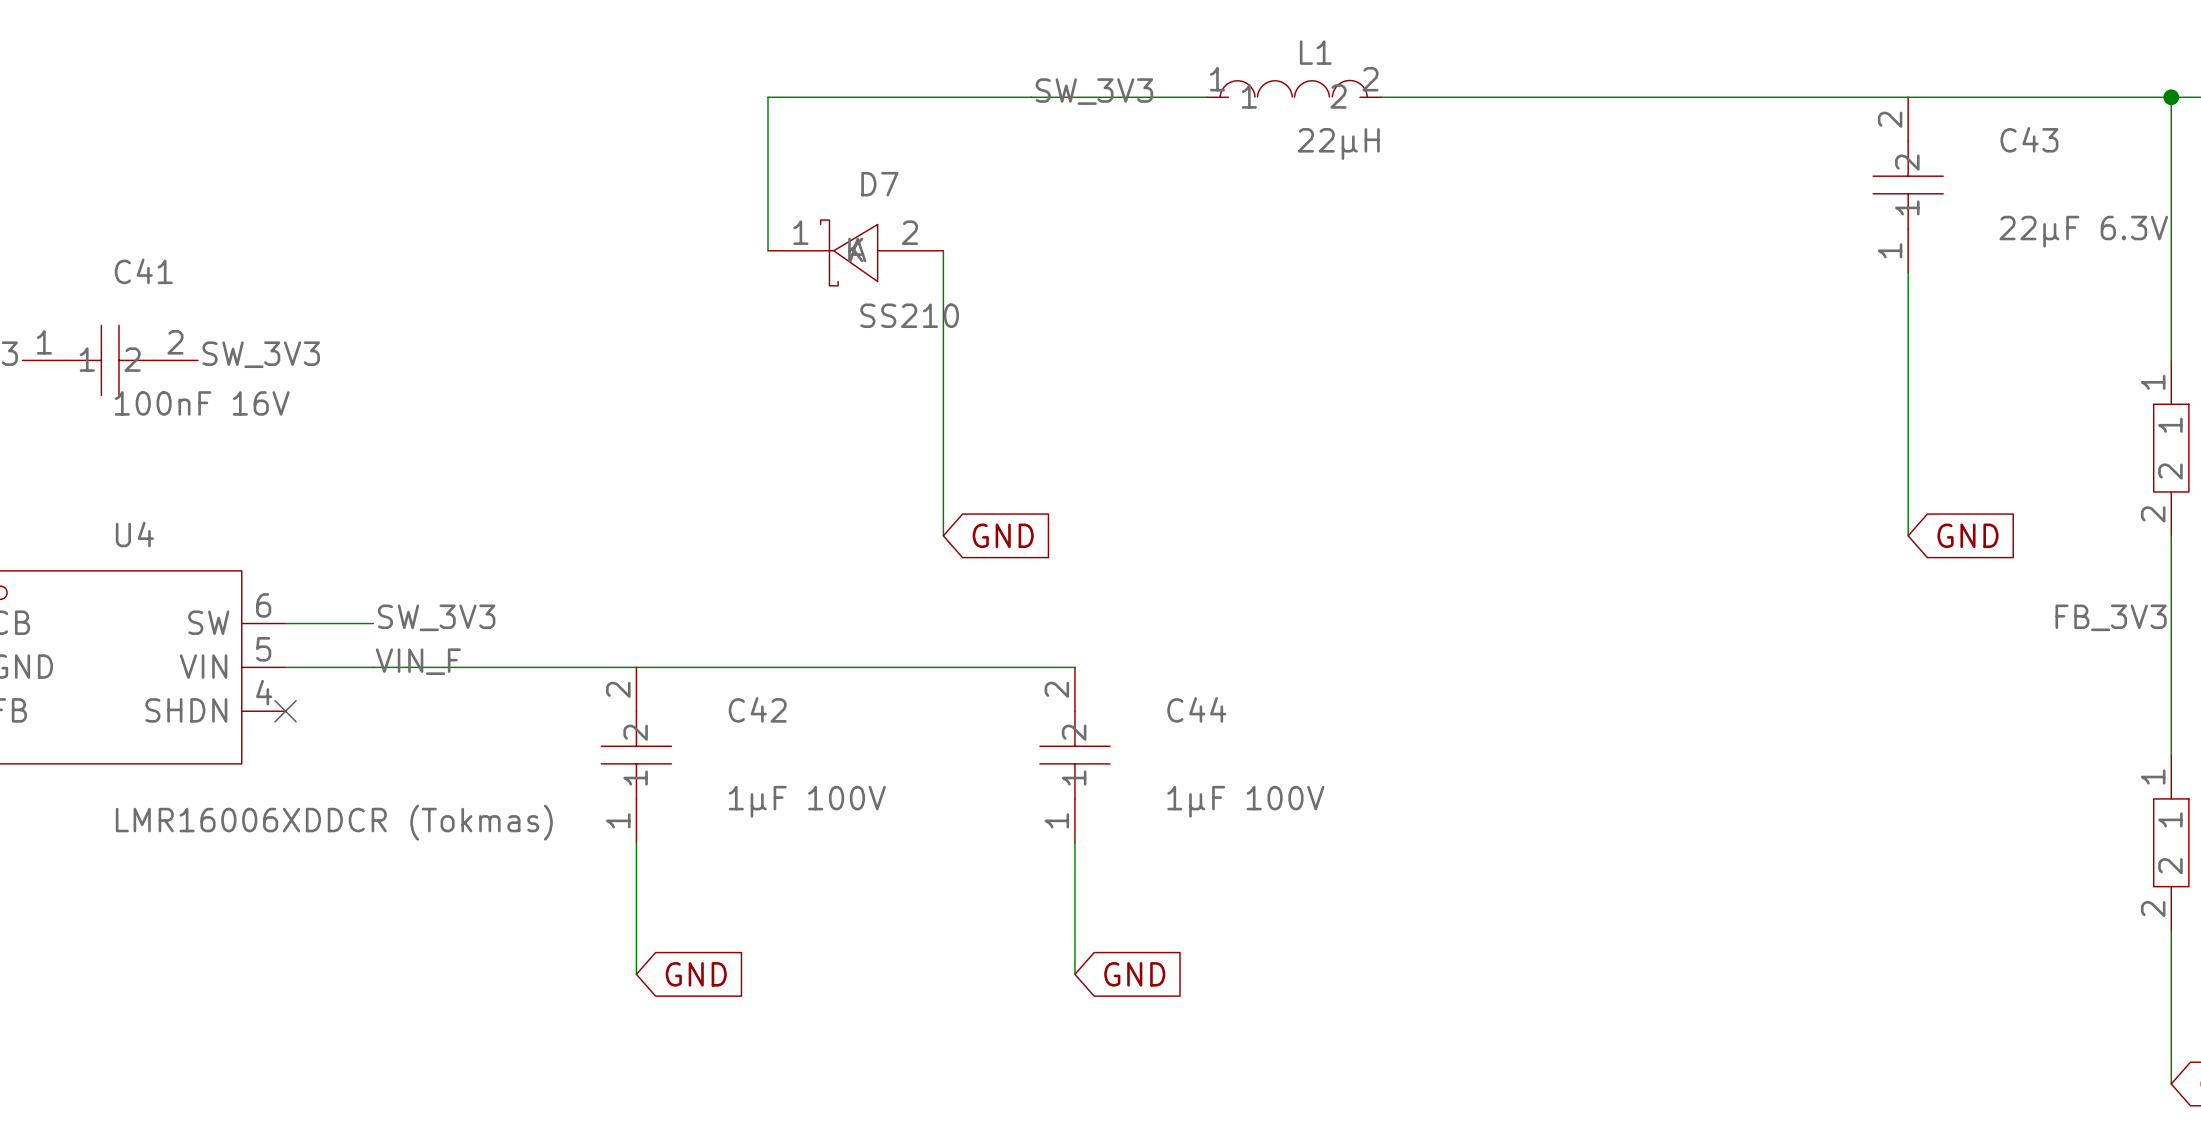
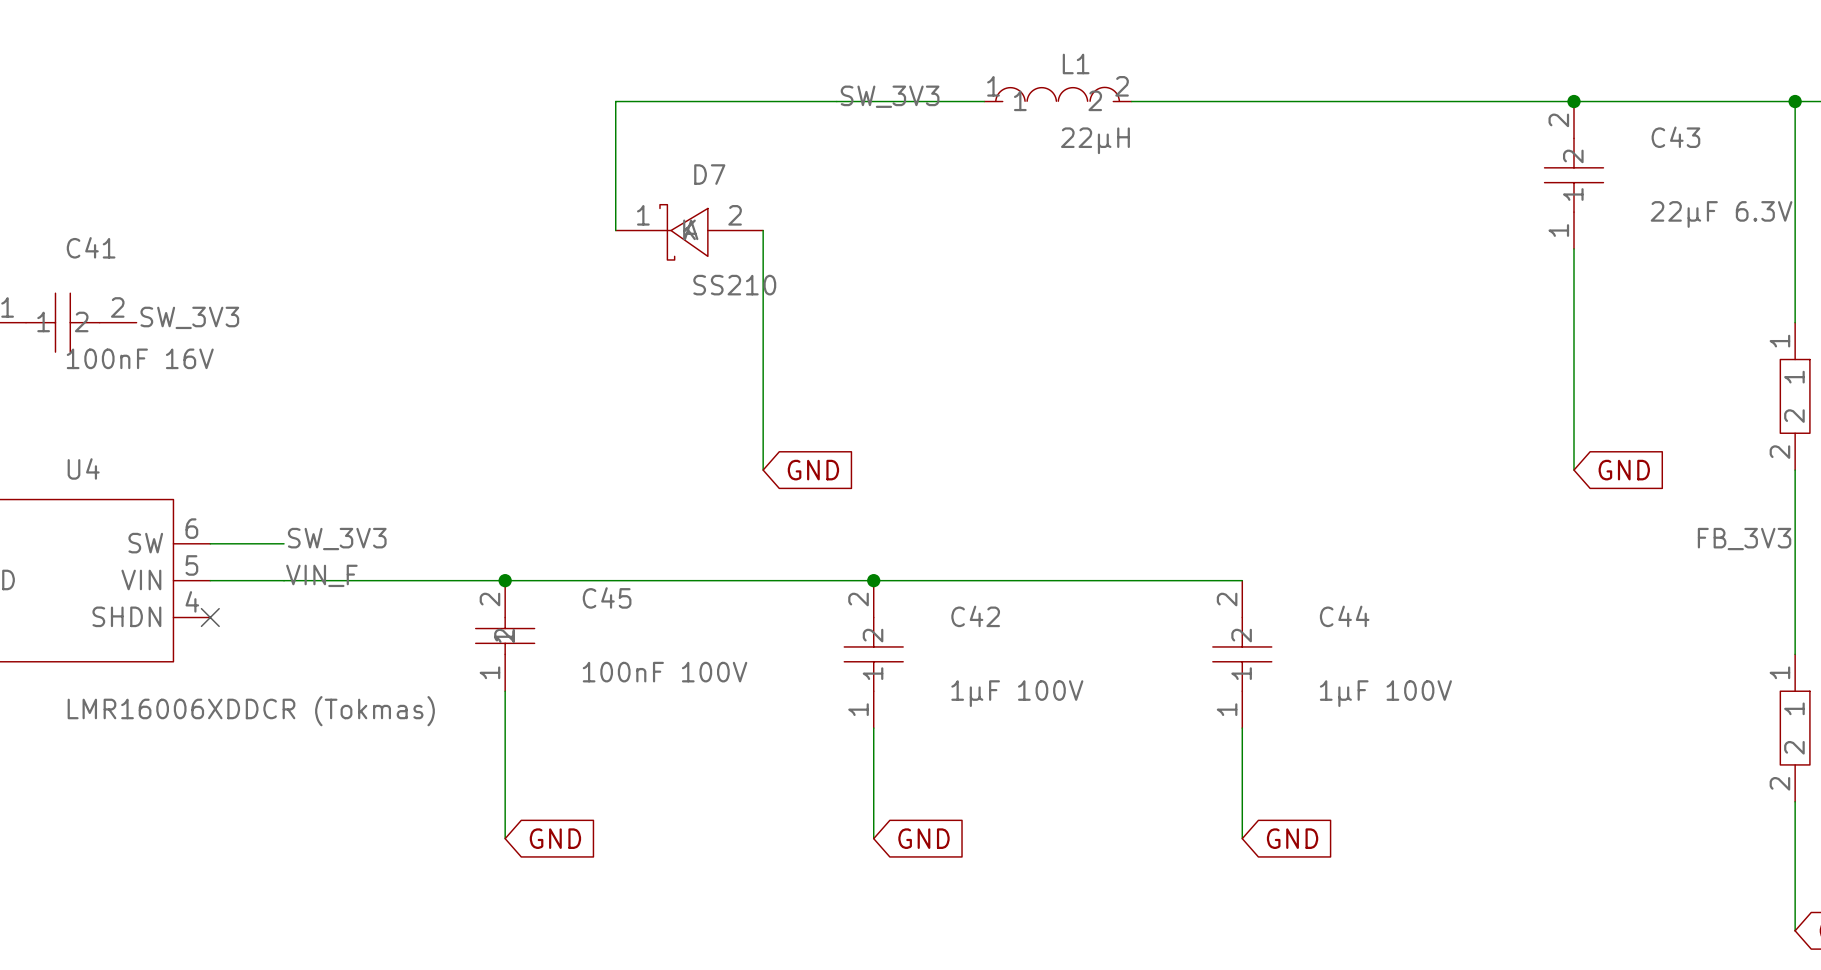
junction: none -> (1574, 101)
junction: none -> (505, 580)
wire: none -> (873, 580) (1242, 580)
junction: none -> (873, 580)
C44 name: C44 (1196, 709) -> C42 (975, 616)
C45: none -> 100nF 100V (505, 635)
C42: 1µF 100V (636, 755) -> none
C44: none -> 1µF 100V (1242, 654)
wire: none -> (1242, 728) (1242, 838)
global label: none -> GND (1292, 838)

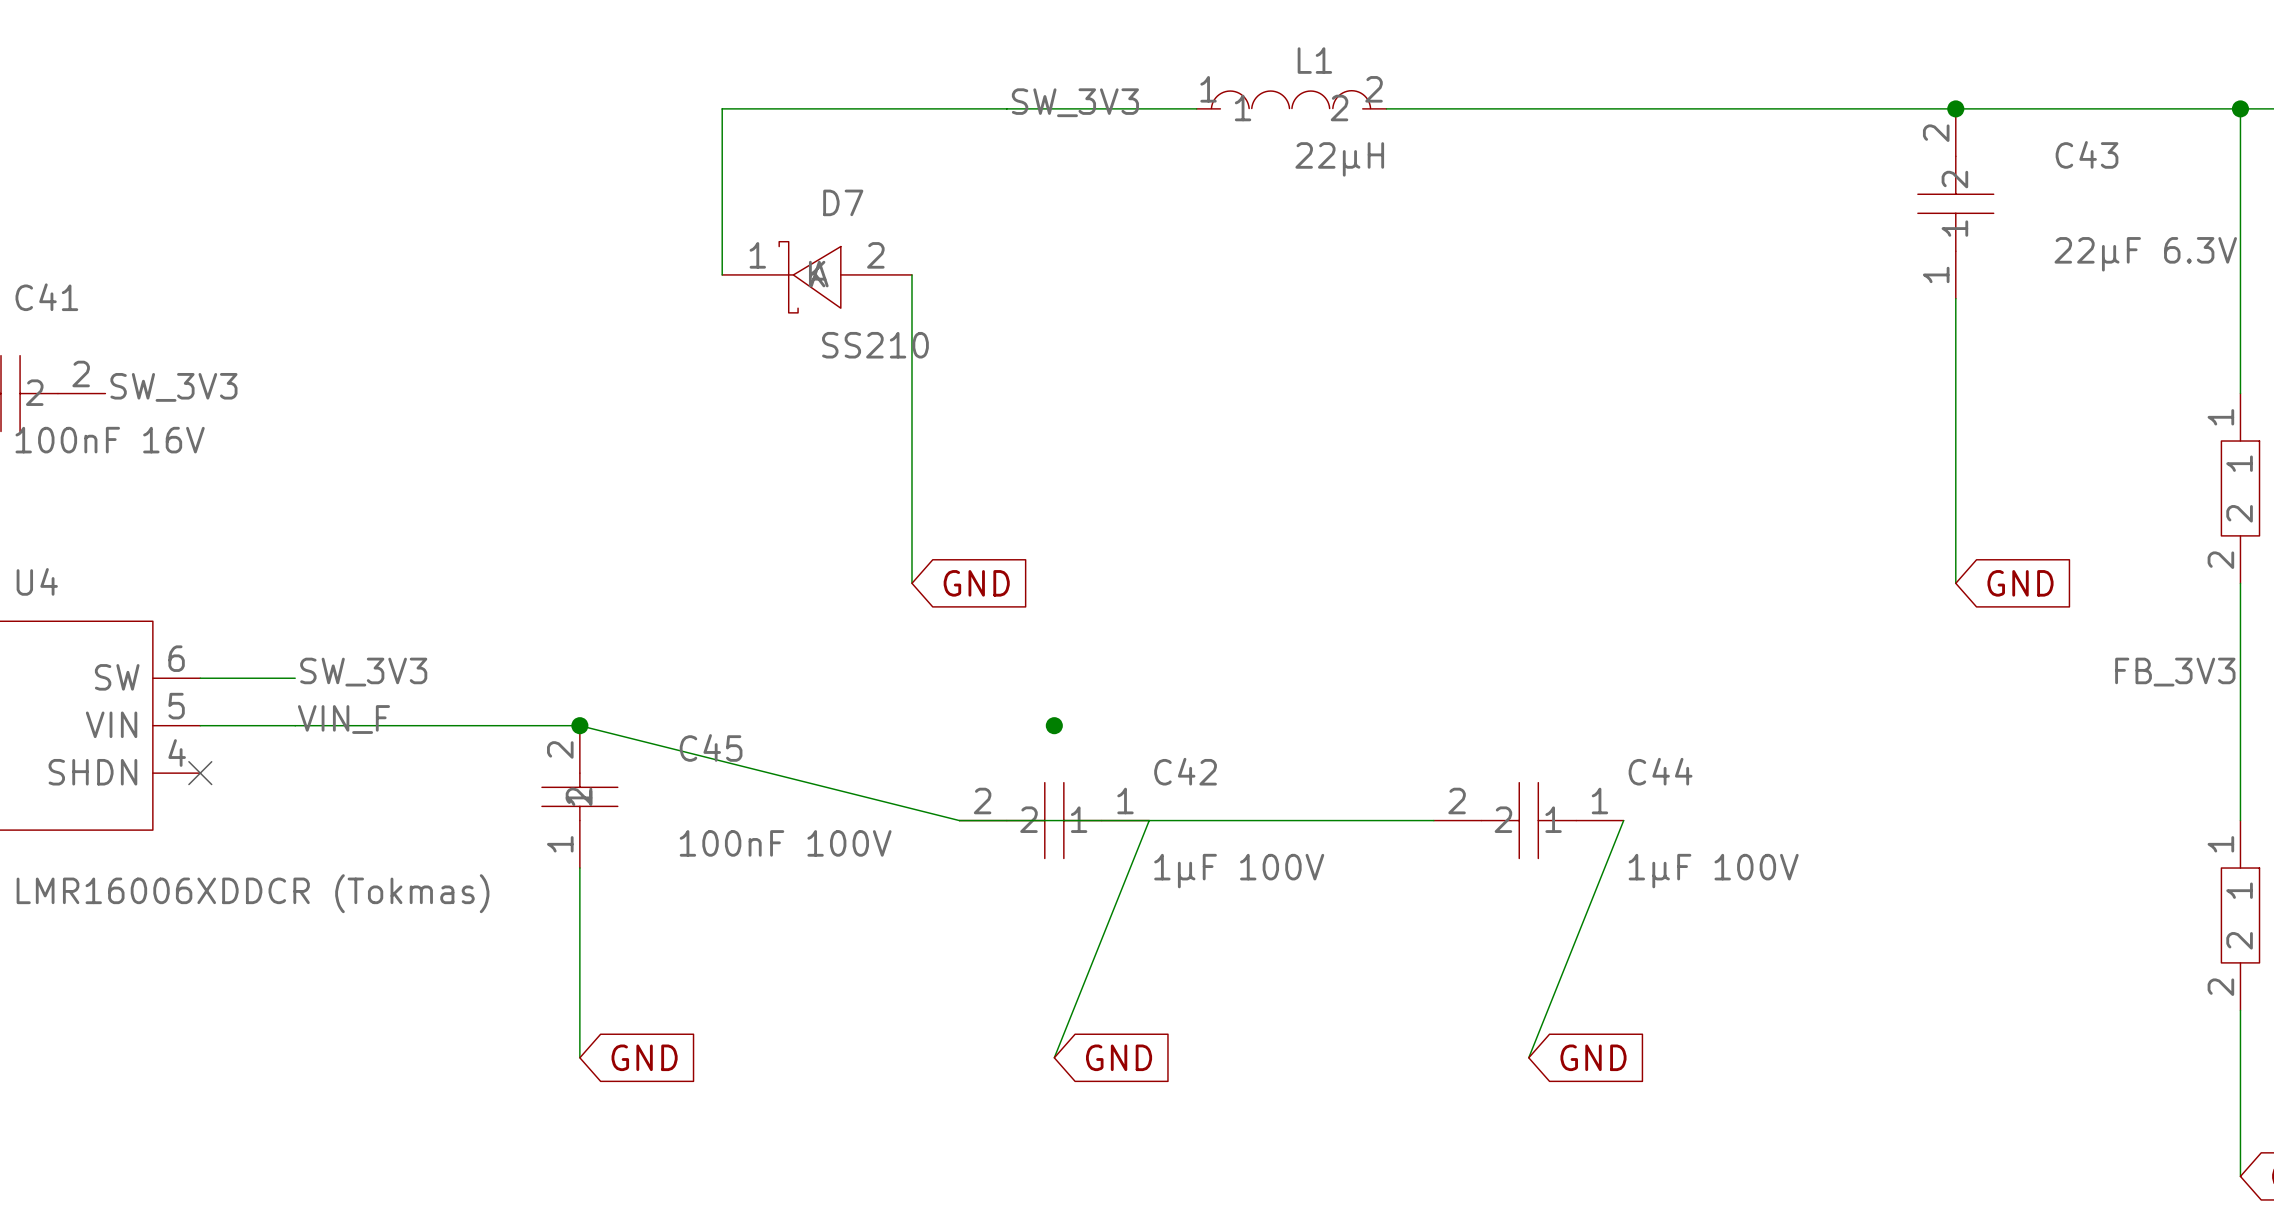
wire: (505, 580) (1242, 580) -> (579, 725) (959, 820) (1433, 820)
C42 rotation: 0° (873, 654) -> 90° counterclockwise (1054, 820)
C44 rotation: 0° (1242, 654) -> 90° counterclockwise (1528, 820)
wire: (873, 728) (873, 838) -> (1149, 820) (1054, 1057)
wire: (1242, 728) (1242, 838) -> (1623, 820) (1528, 1057)

